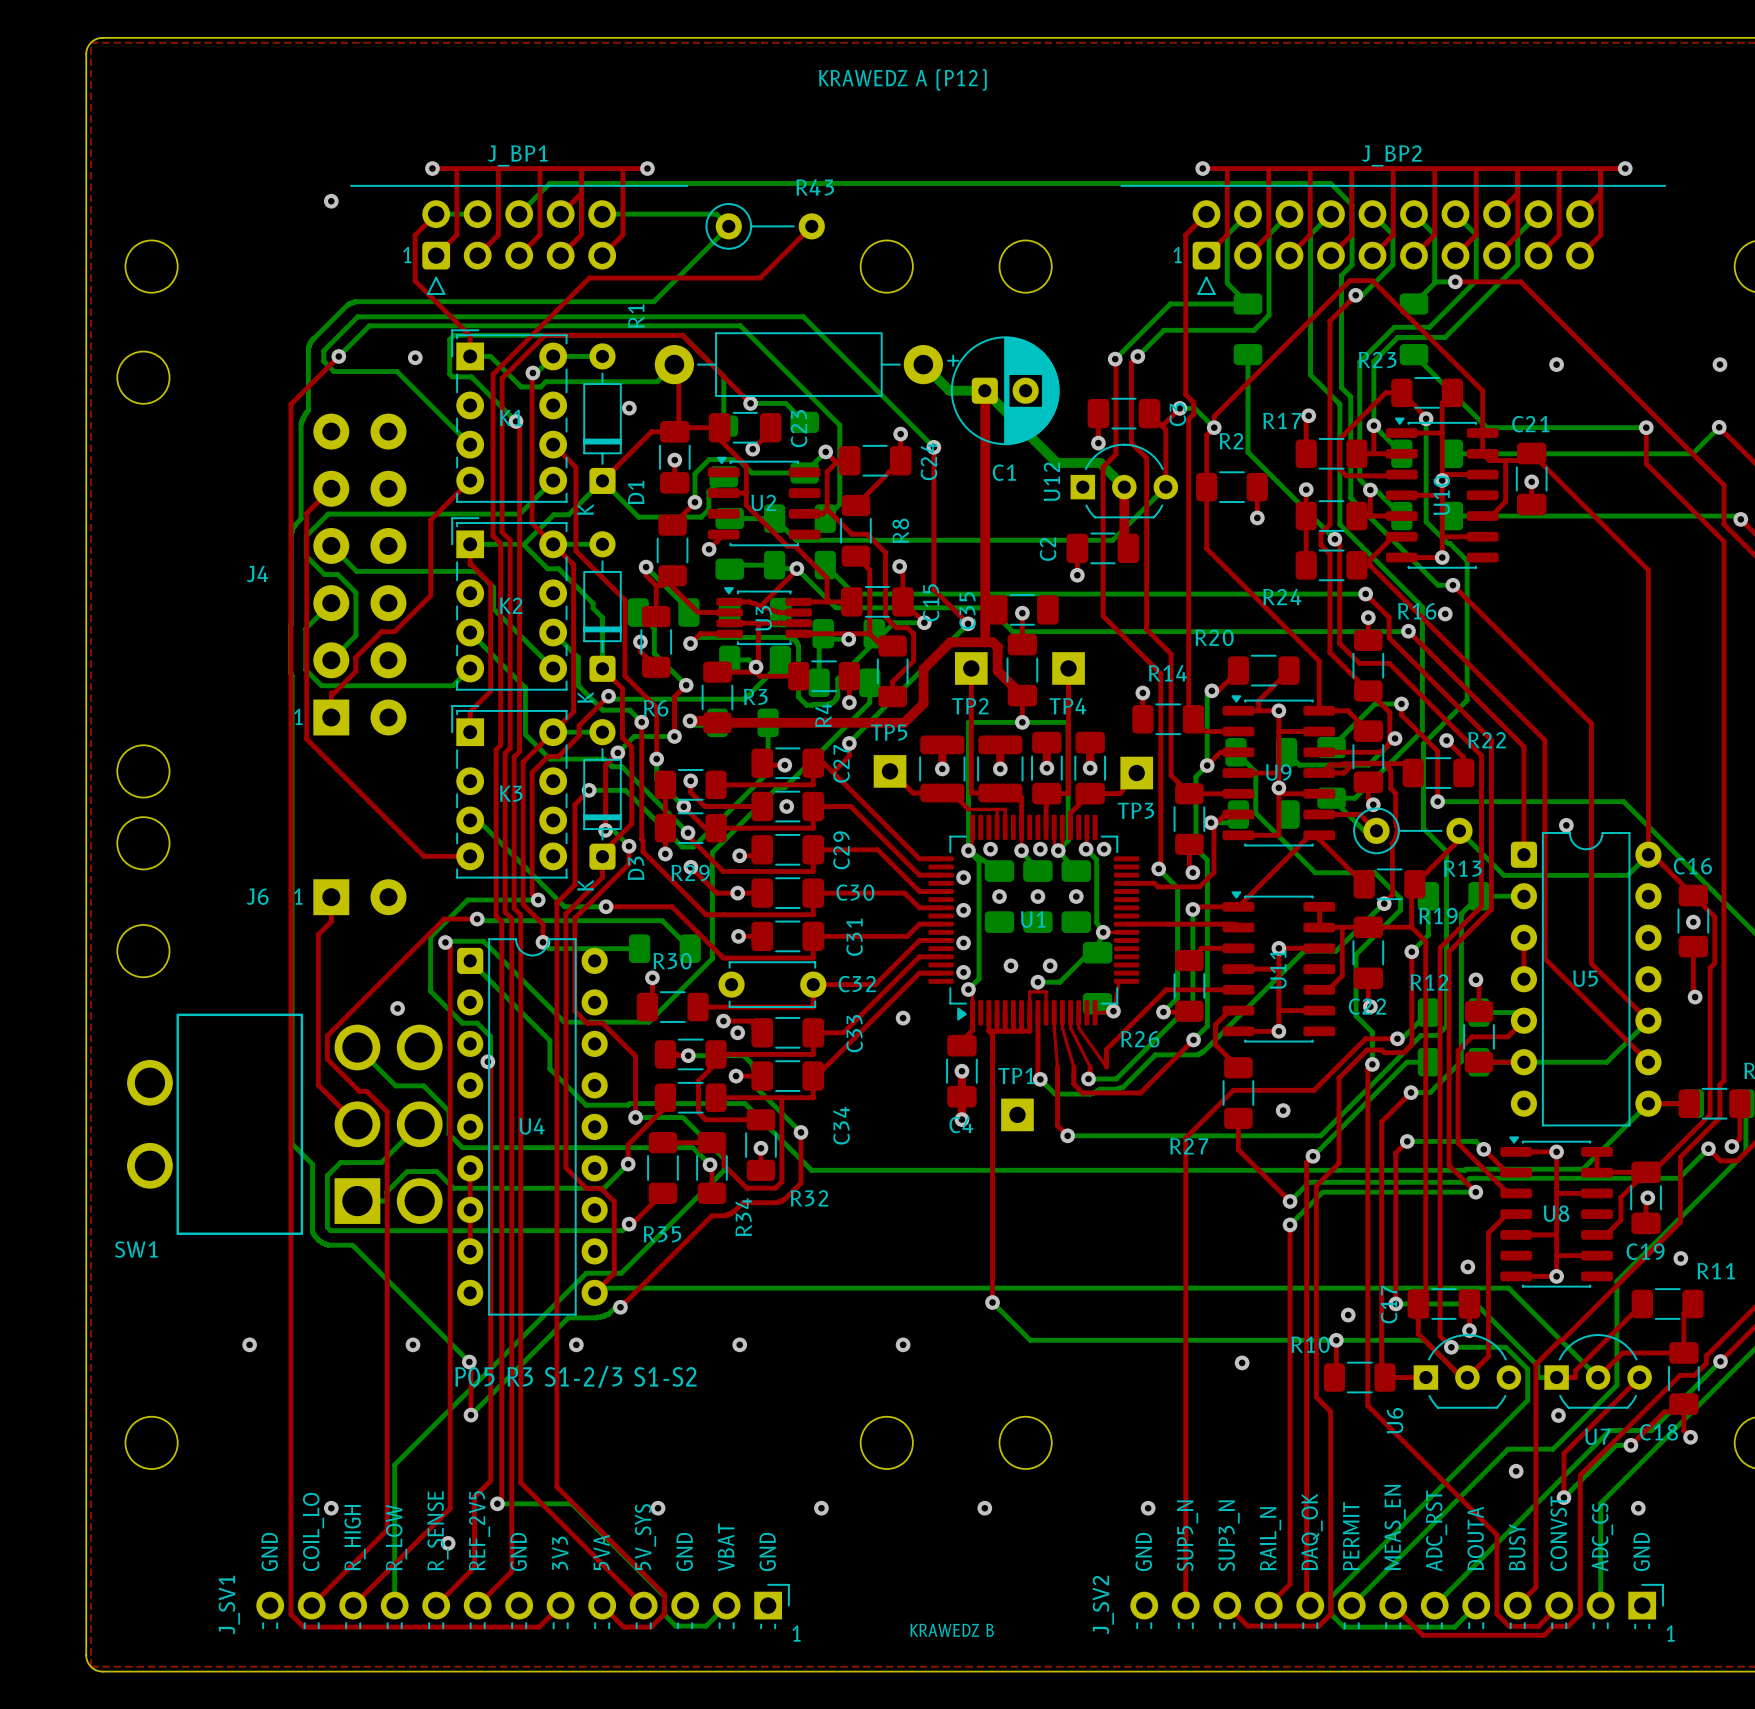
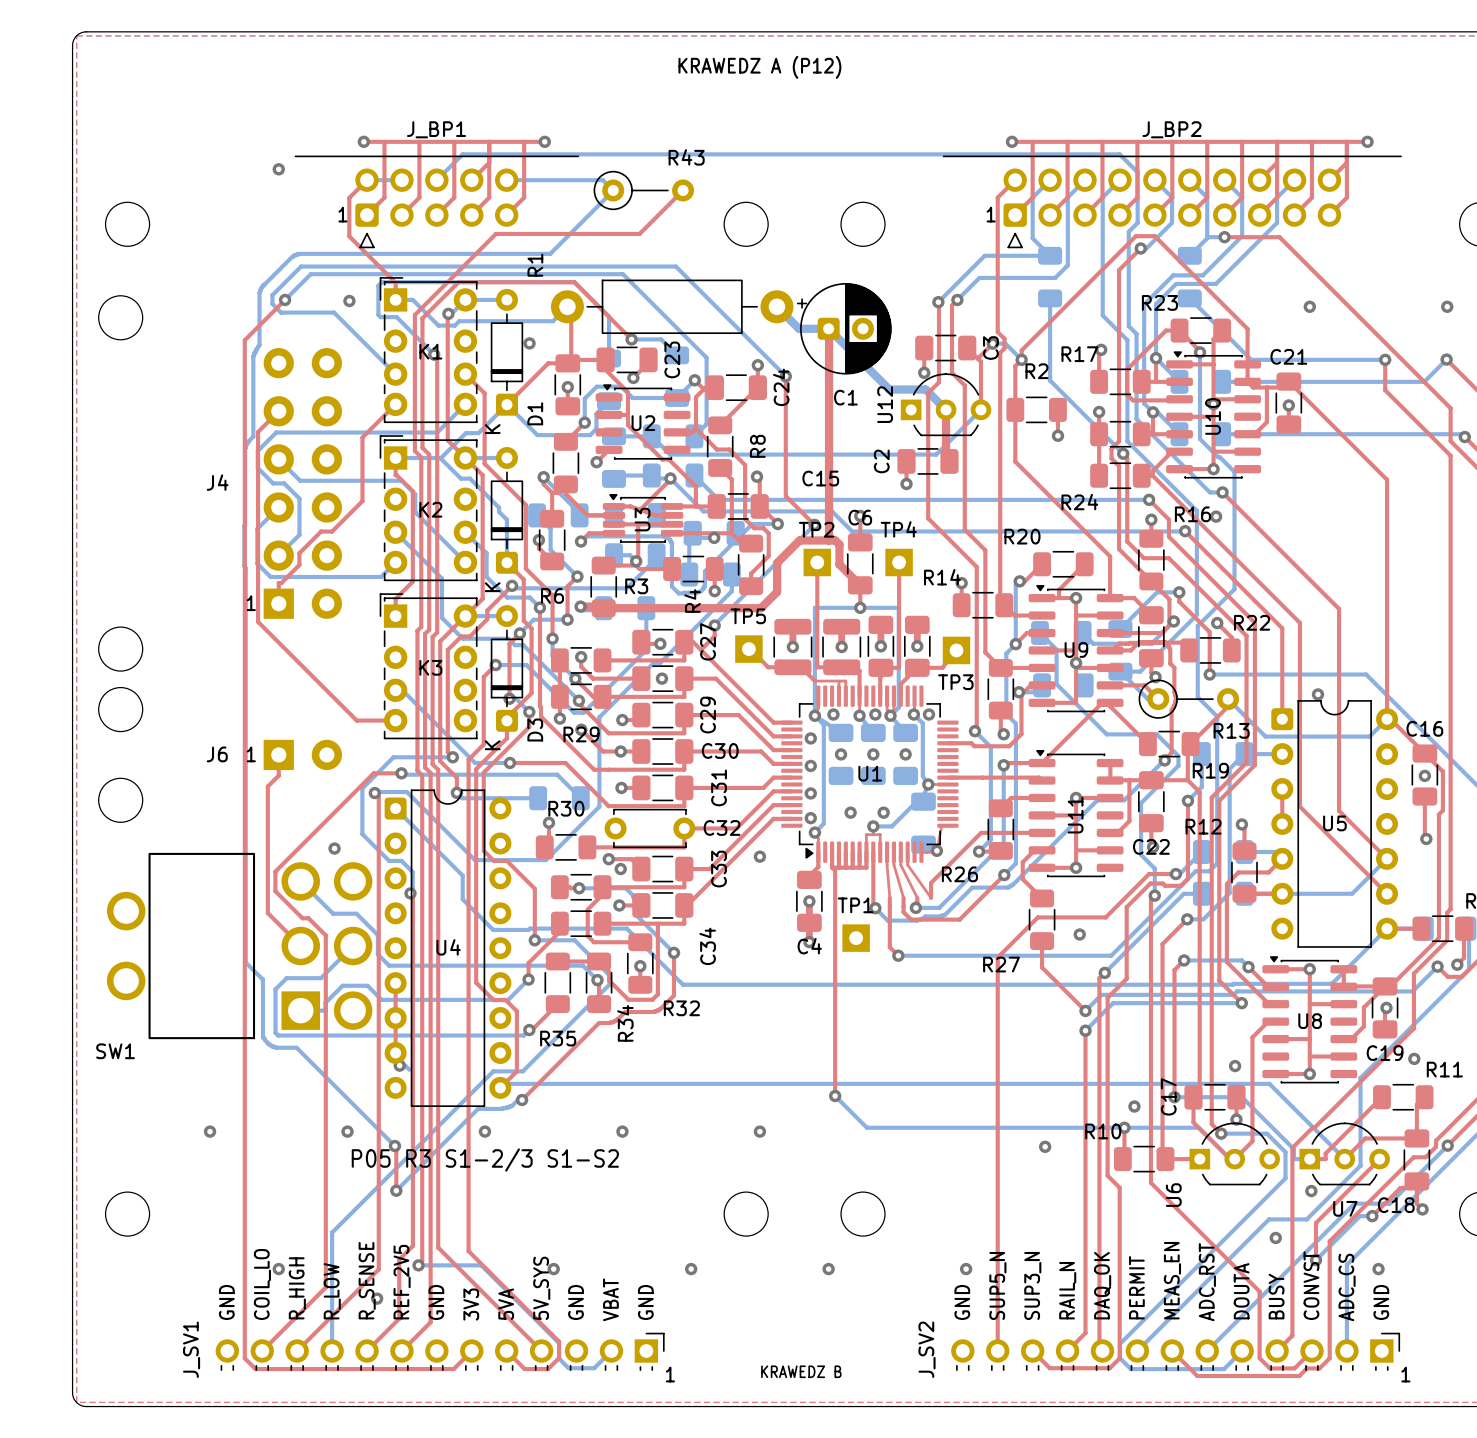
C15 name rotation: 0° (931, 602) -> 90° clockwise (820, 478)
C35: (1022, 609) -> none
C6 name: none -> C6 (860, 517)
R14 name position: R14 (1167, 673) -> R14 (942, 577)
TP2 name position: TP2 (970, 706) -> TP2 (816, 529)
TP4 name position: TP4 (1067, 706) -> TP4 (898, 529)
bottom track: none -> (399, 1065) (405, 1065) (409, 1069)
via: none -> (399, 1065)

